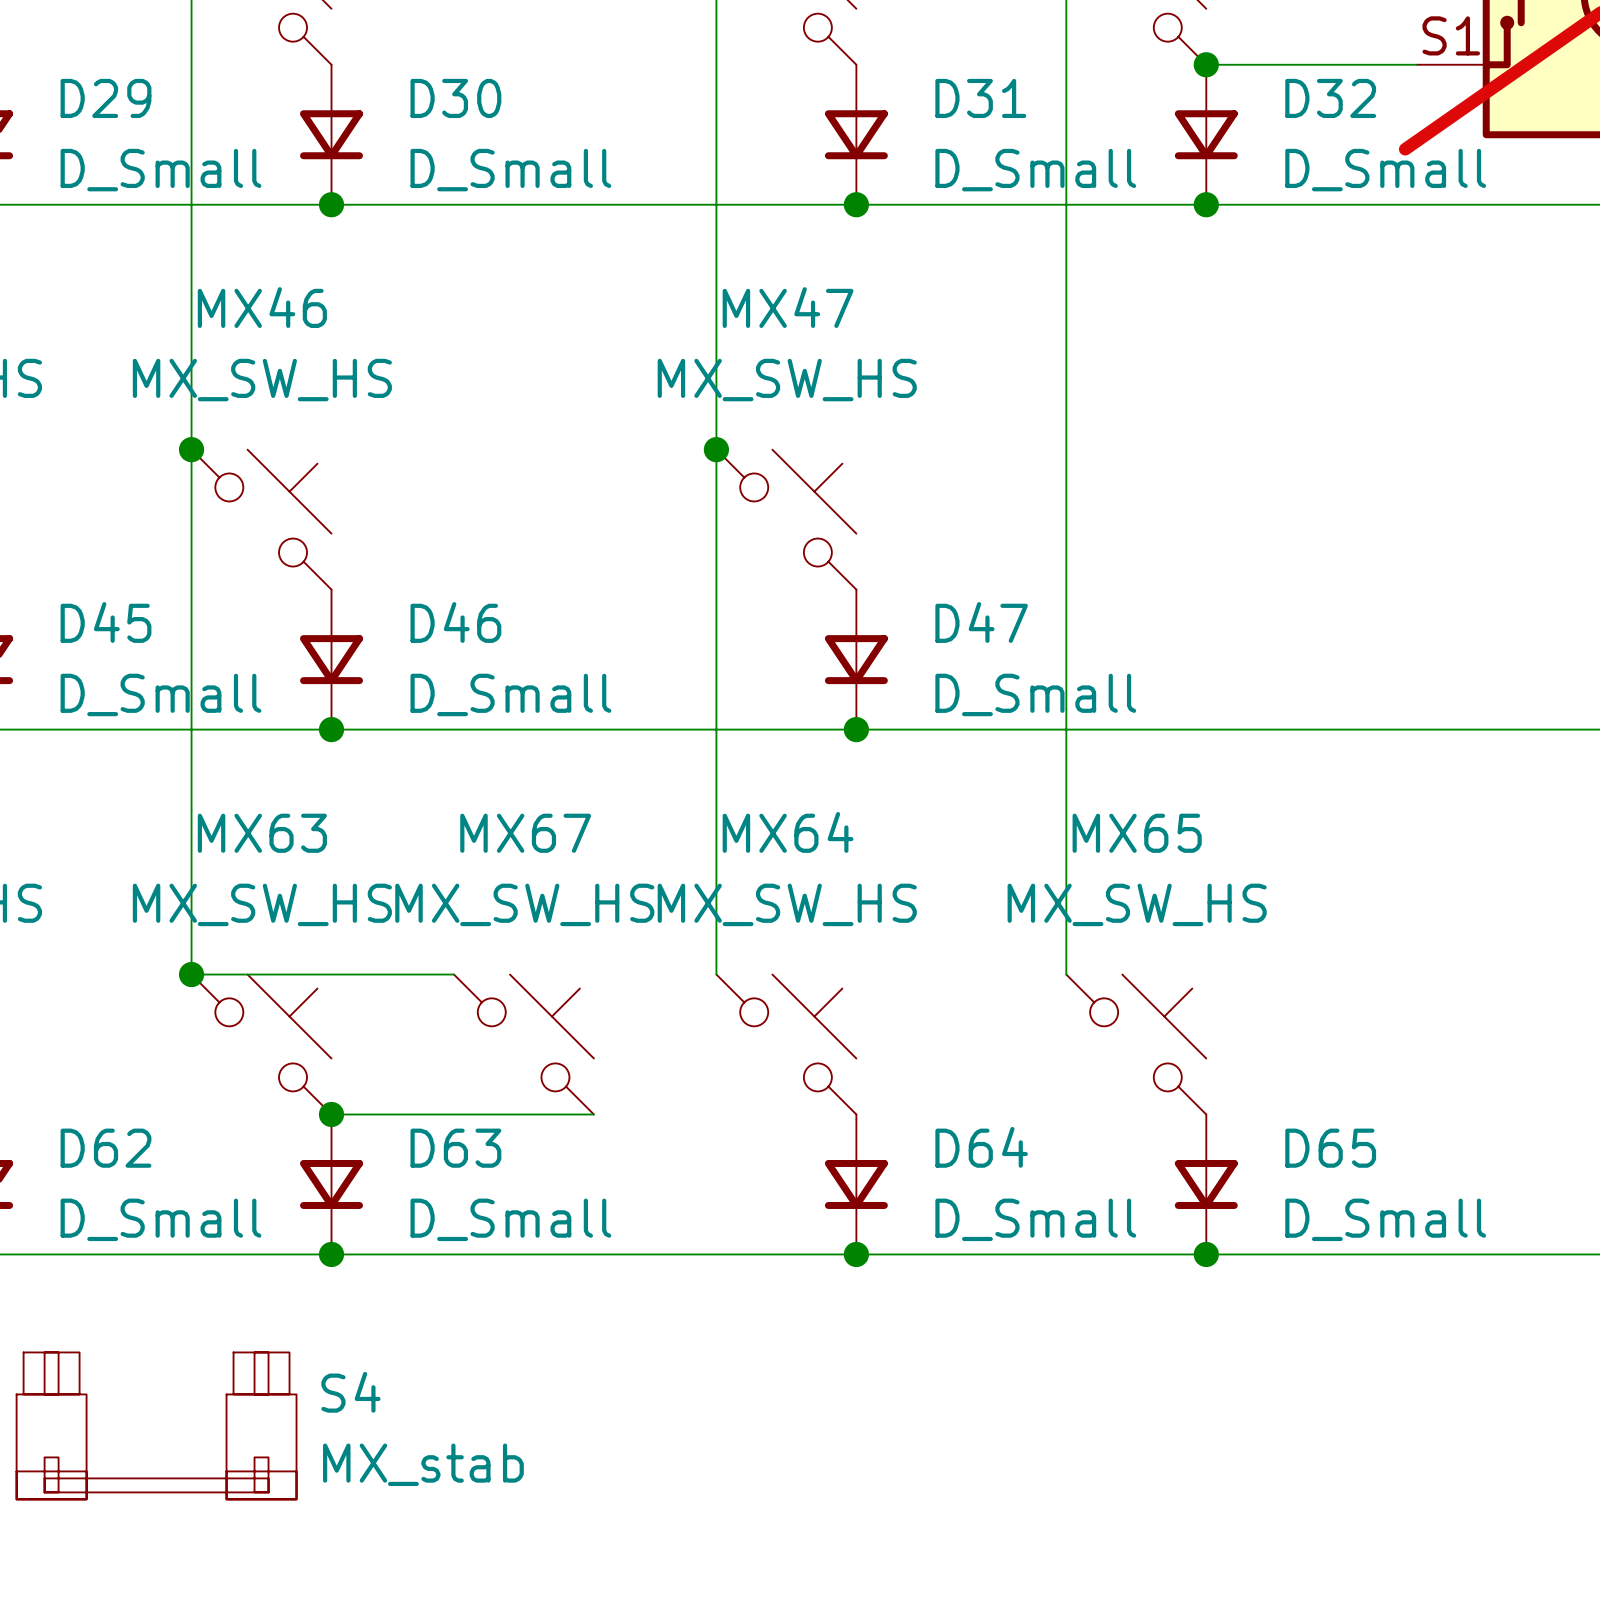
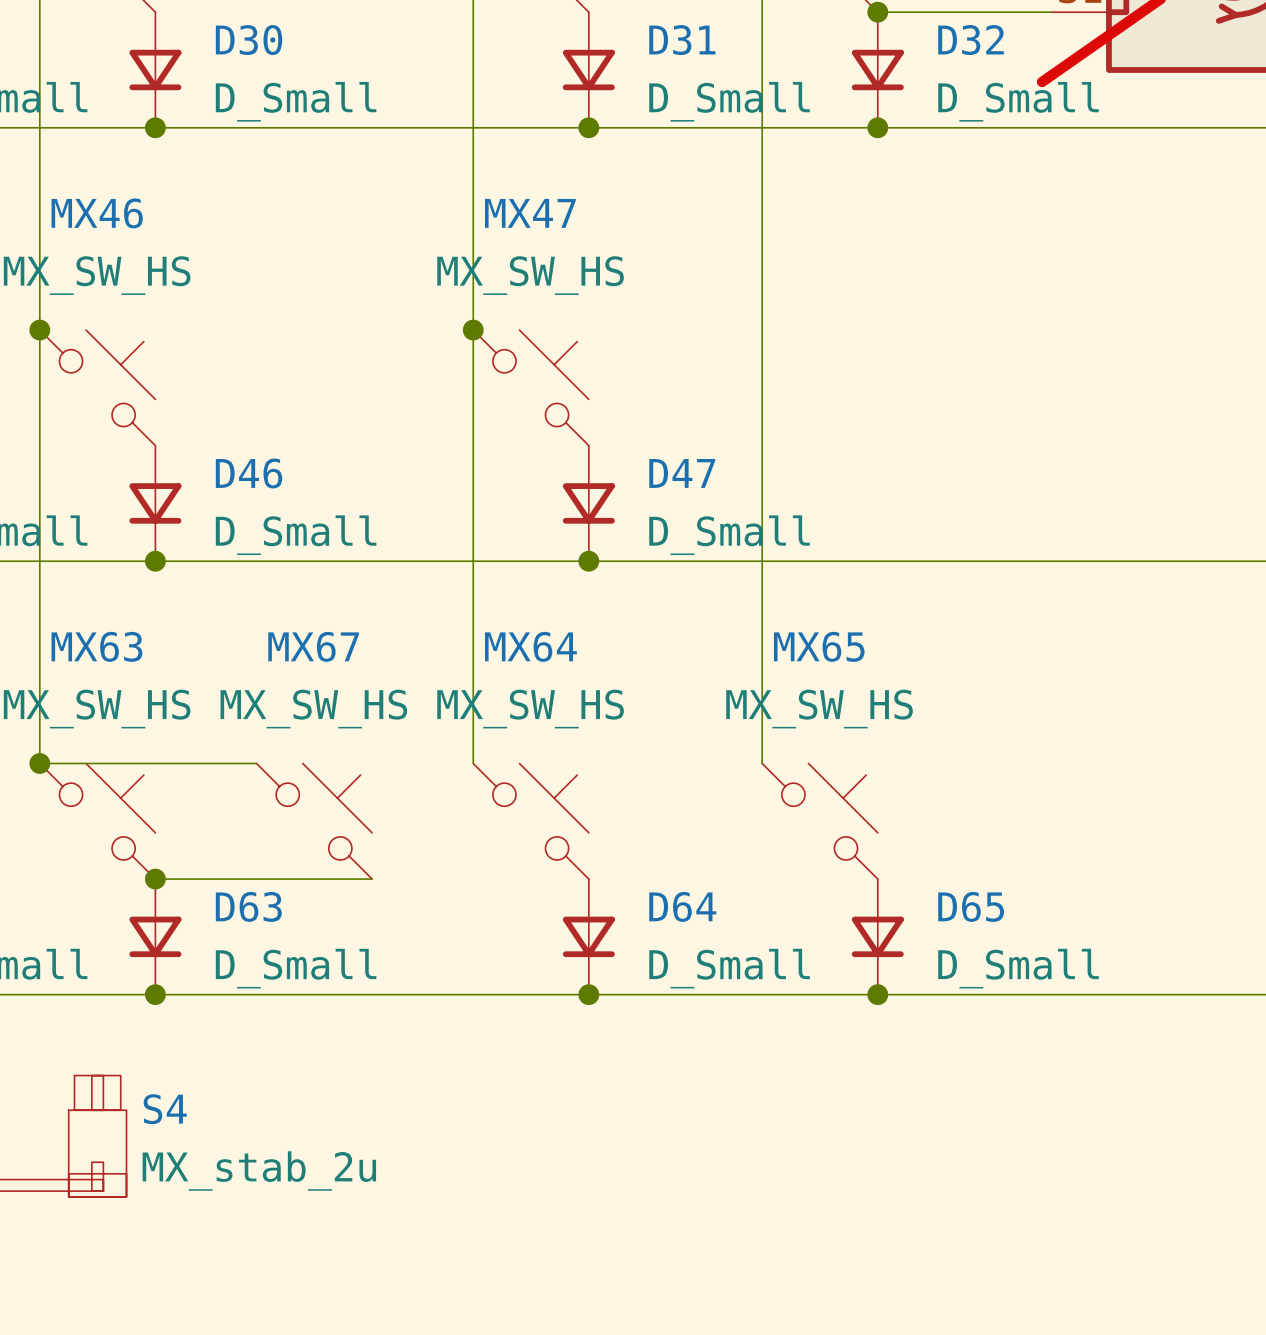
S4 value: MX_stab (423, 1464) -> MX_stab_2u (259, 1171)

